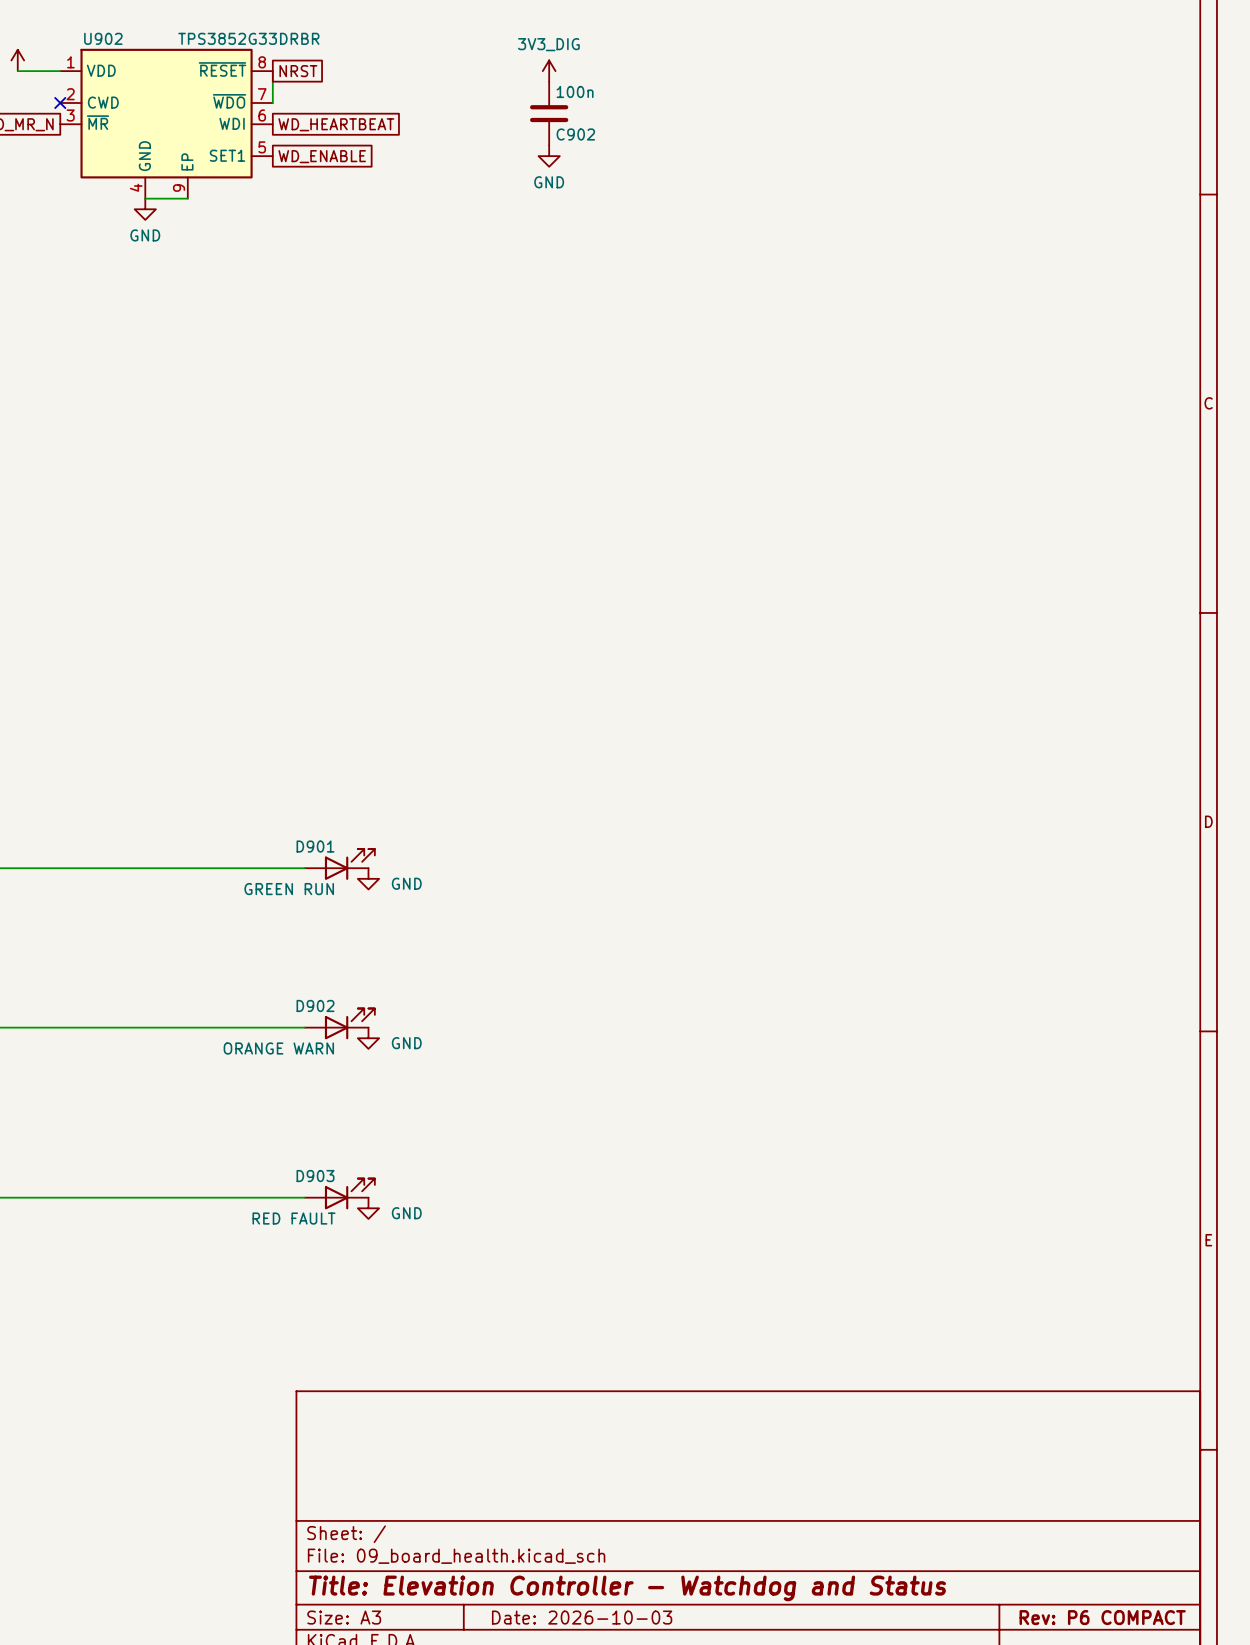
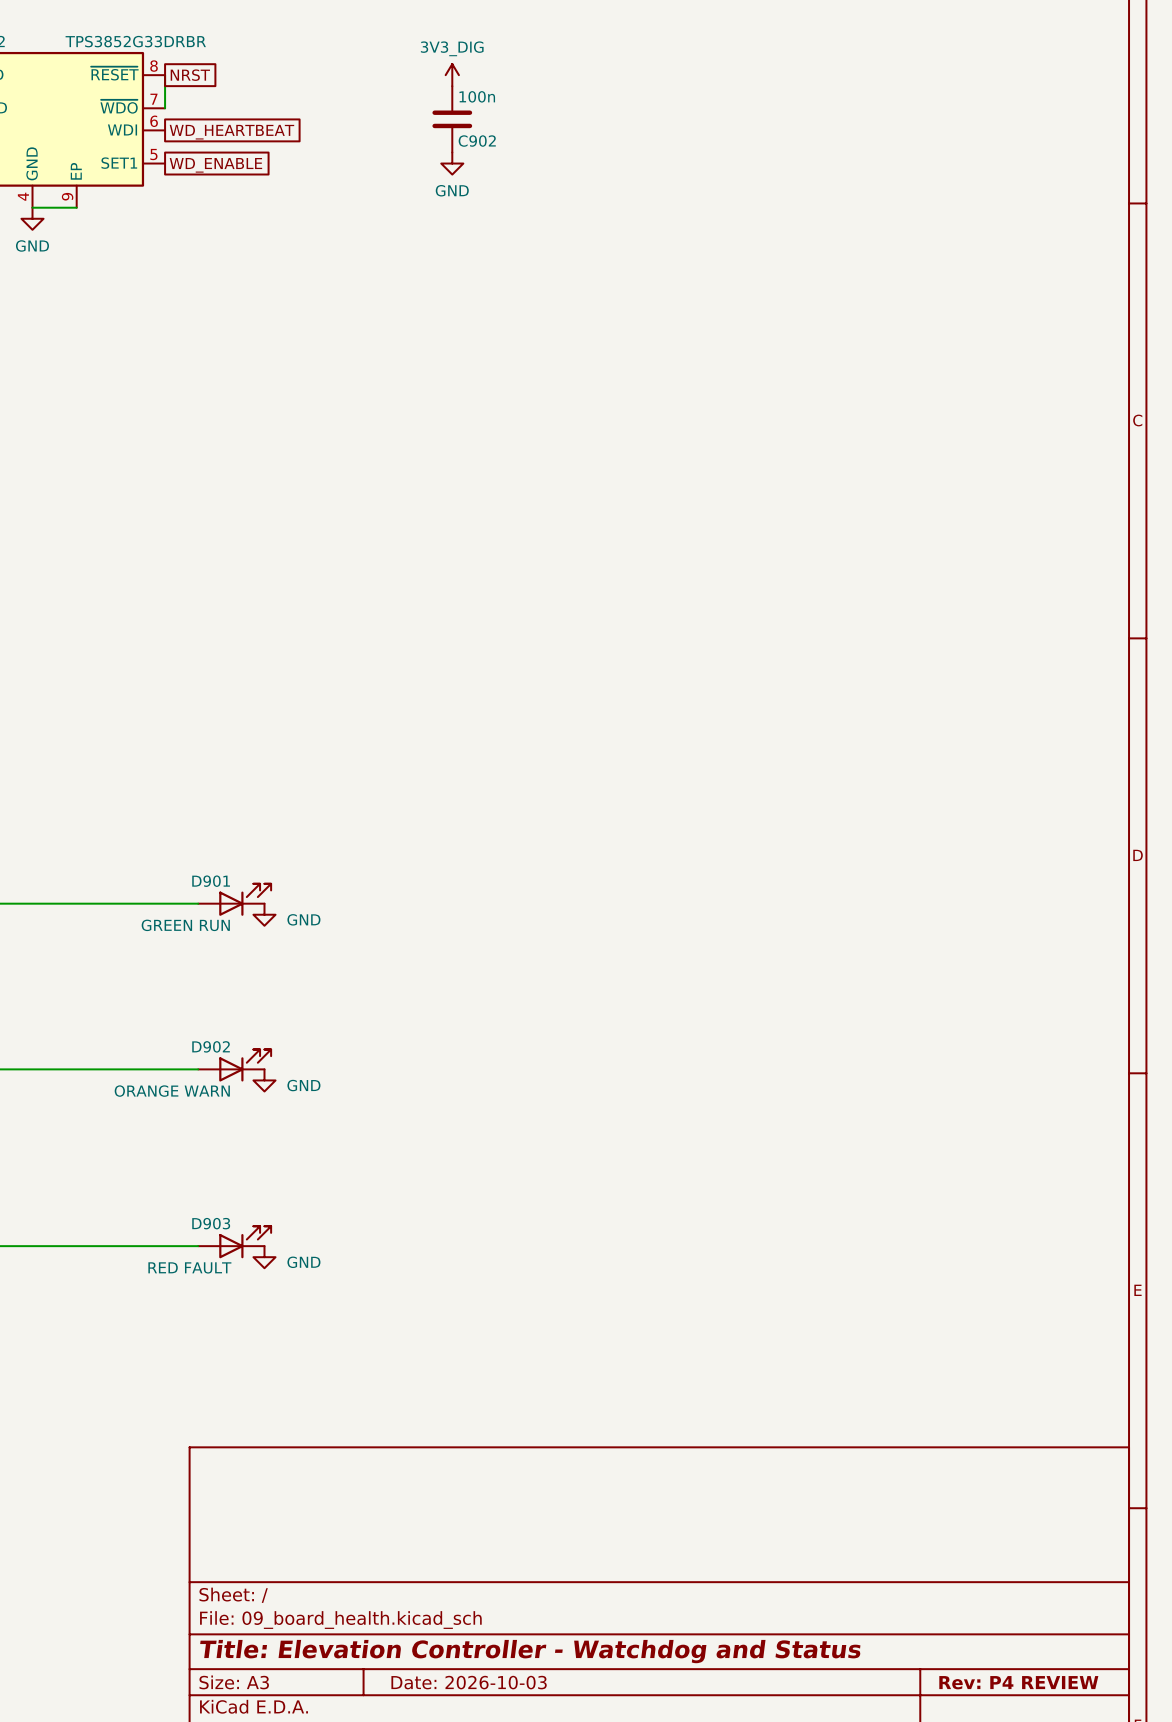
title block: Rev: P6 COMPACT (1102, 1617) -> Rev: P4 REVIEW (1018, 1682)

